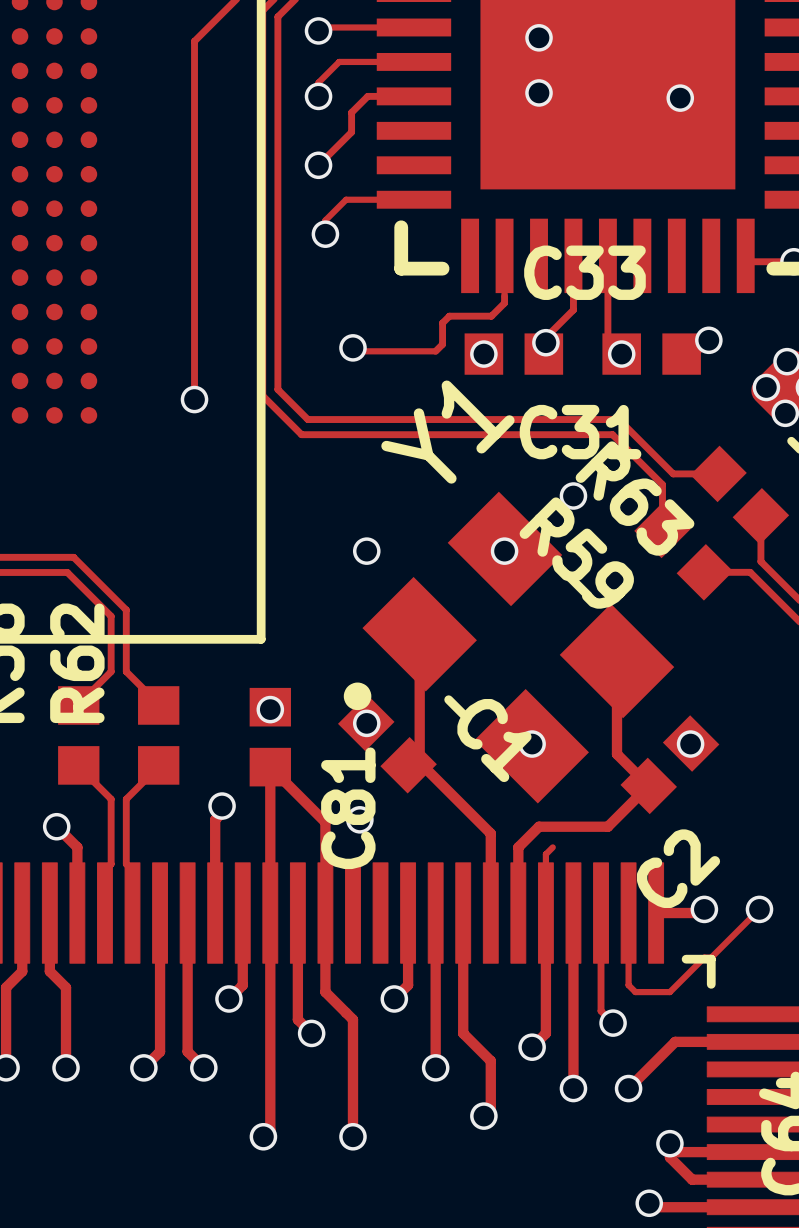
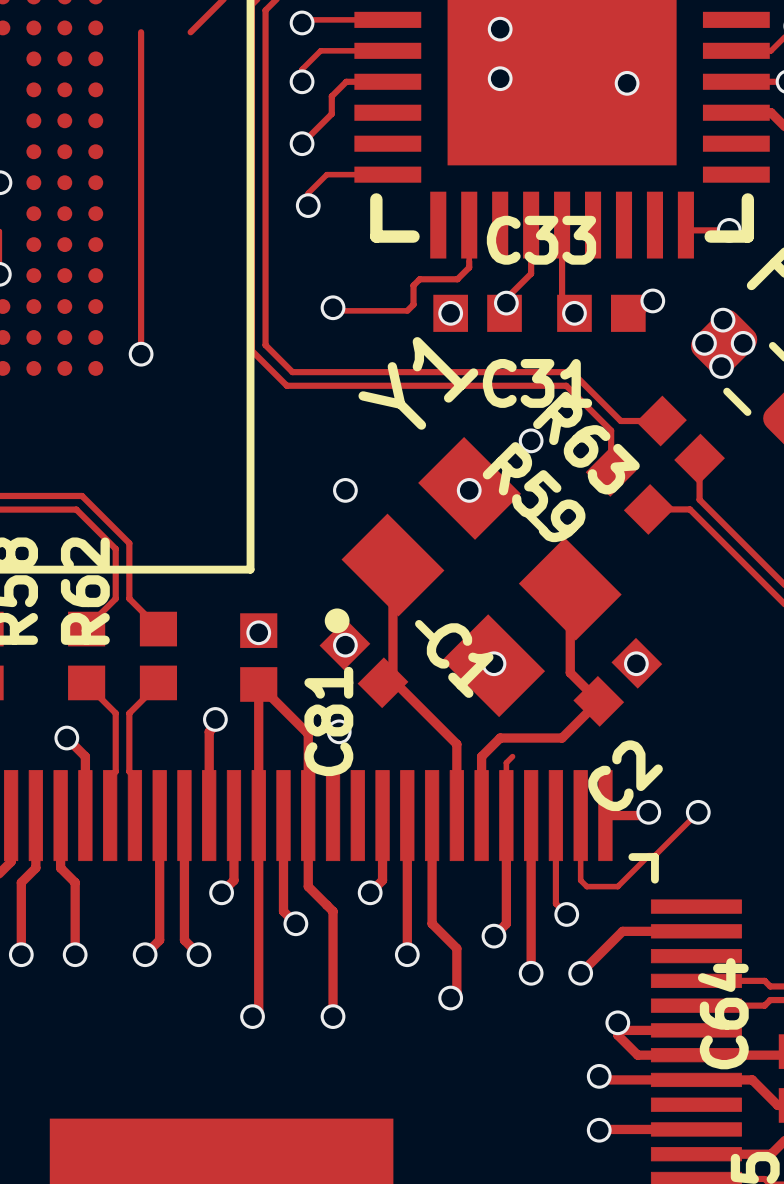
track: (194, 41) (194, 399) -> (141, 32) (141, 354)
via position: (194, 399) -> (141, 354)

